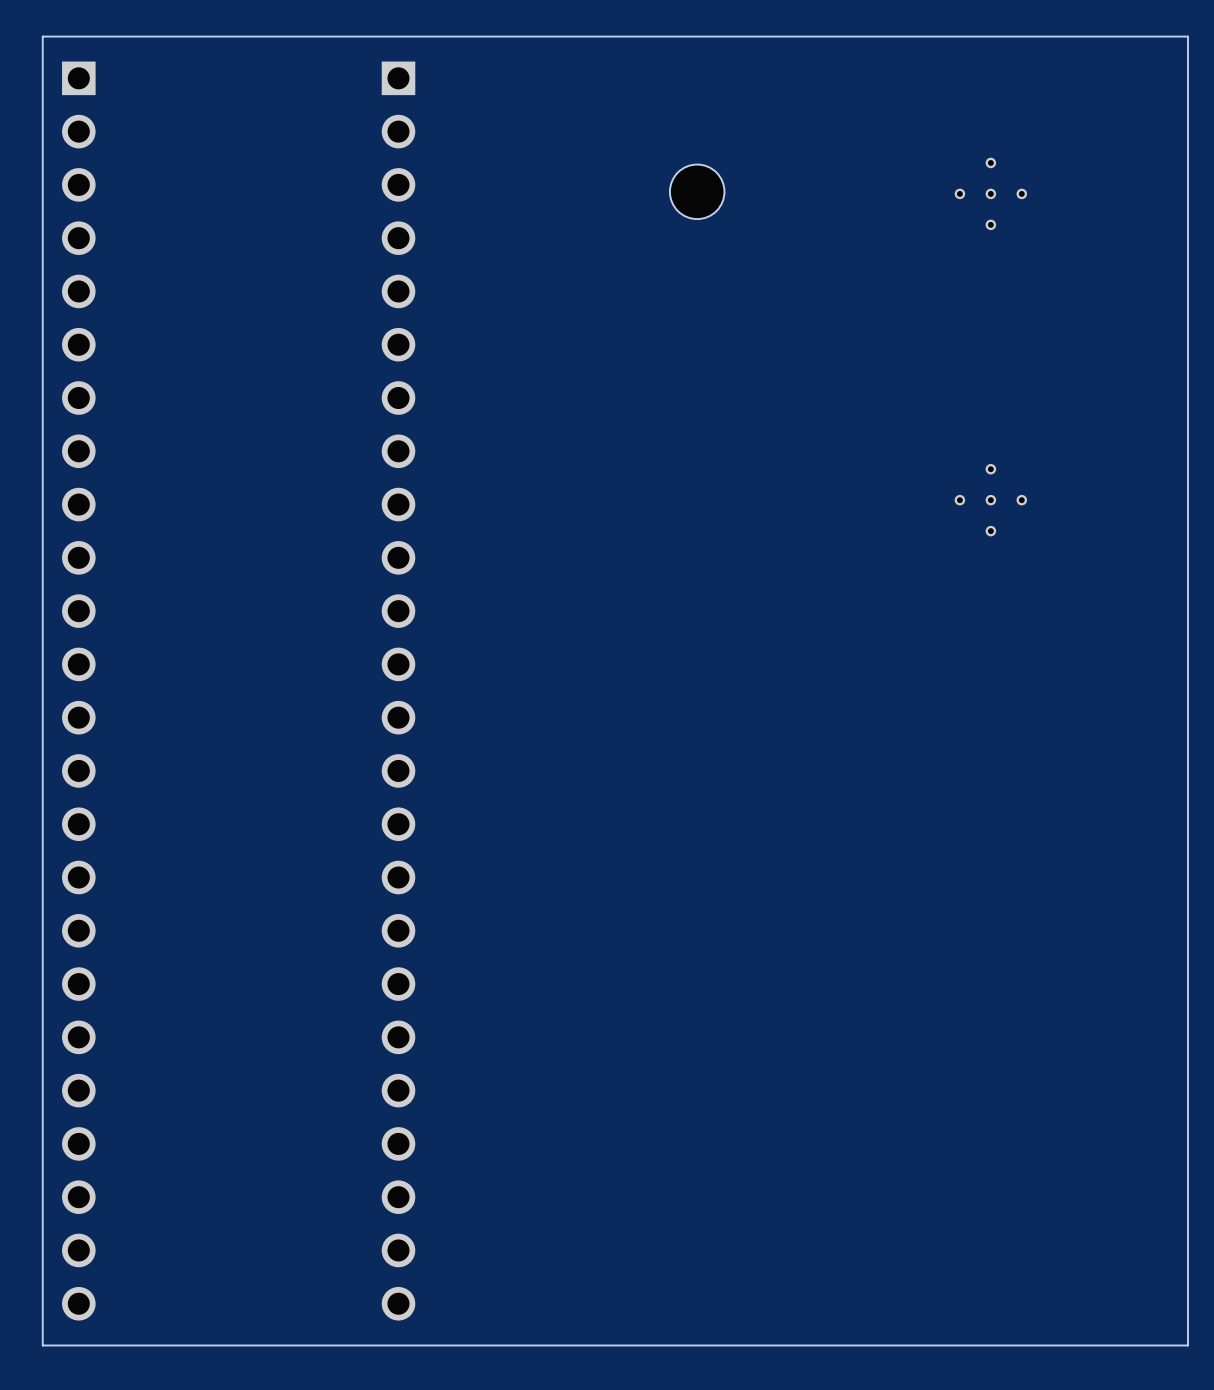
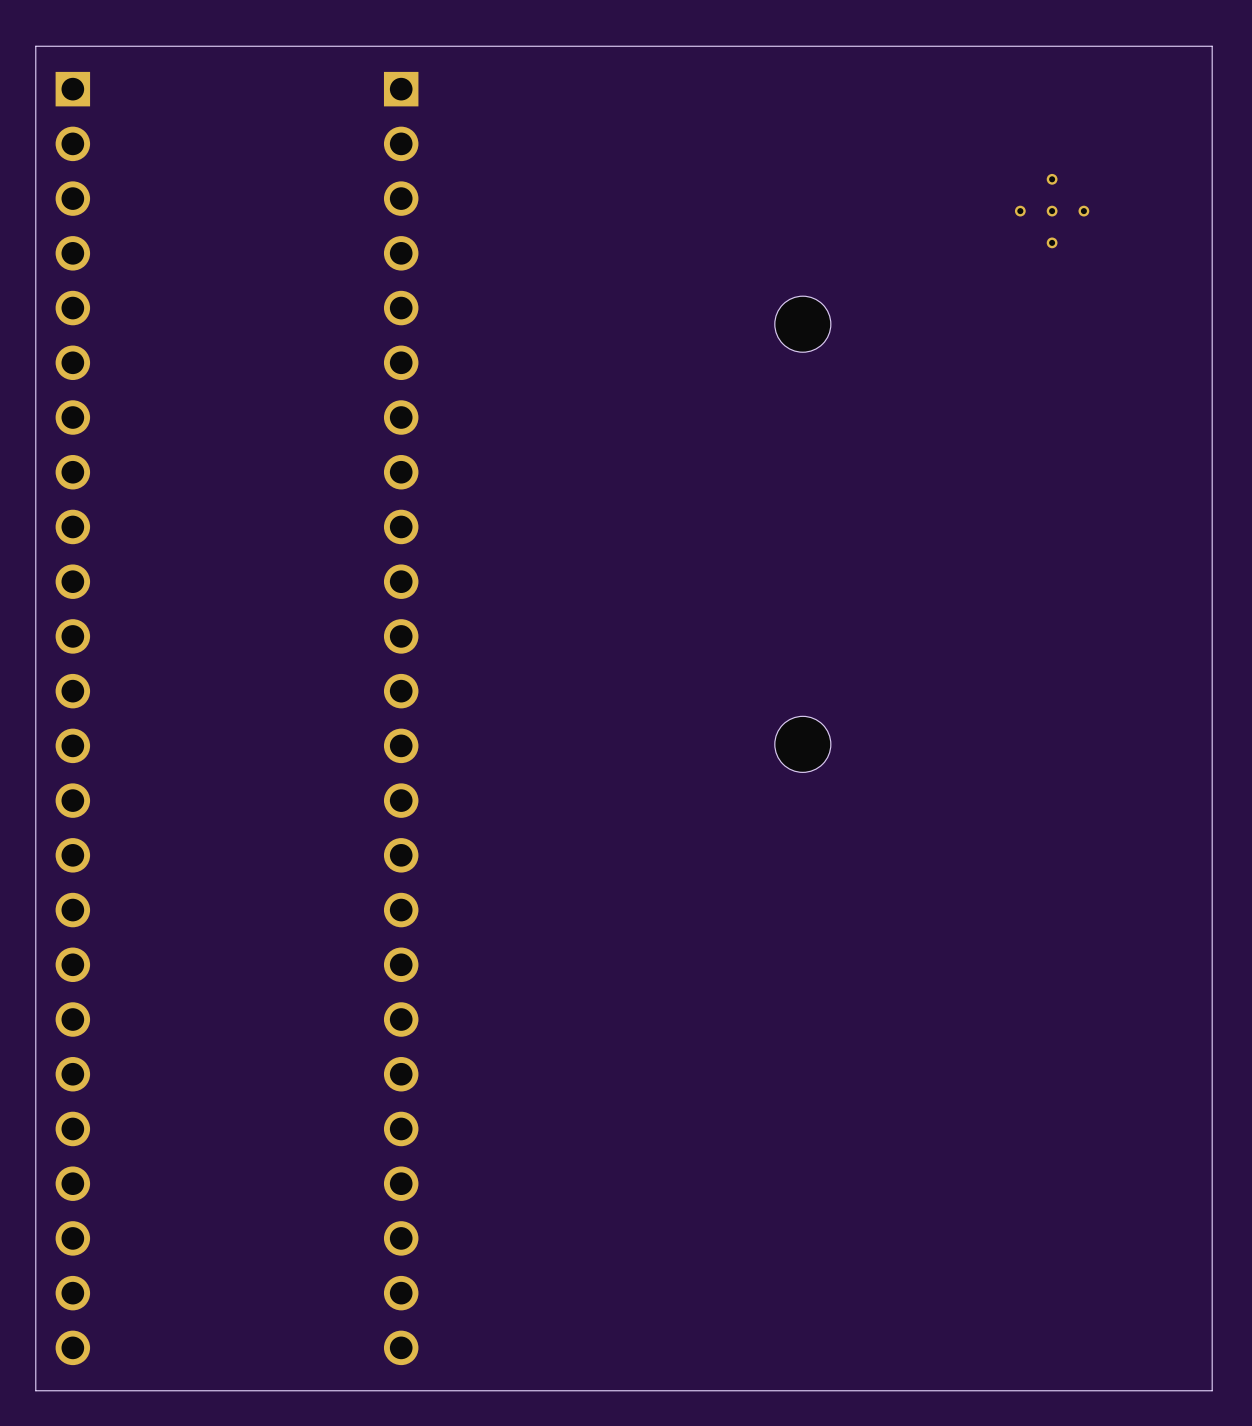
part position: (697, 191) -> (802, 324)
part position: (990, 193) -> (1052, 211)
part: (990, 500) -> none
part: none -> (802, 744)

